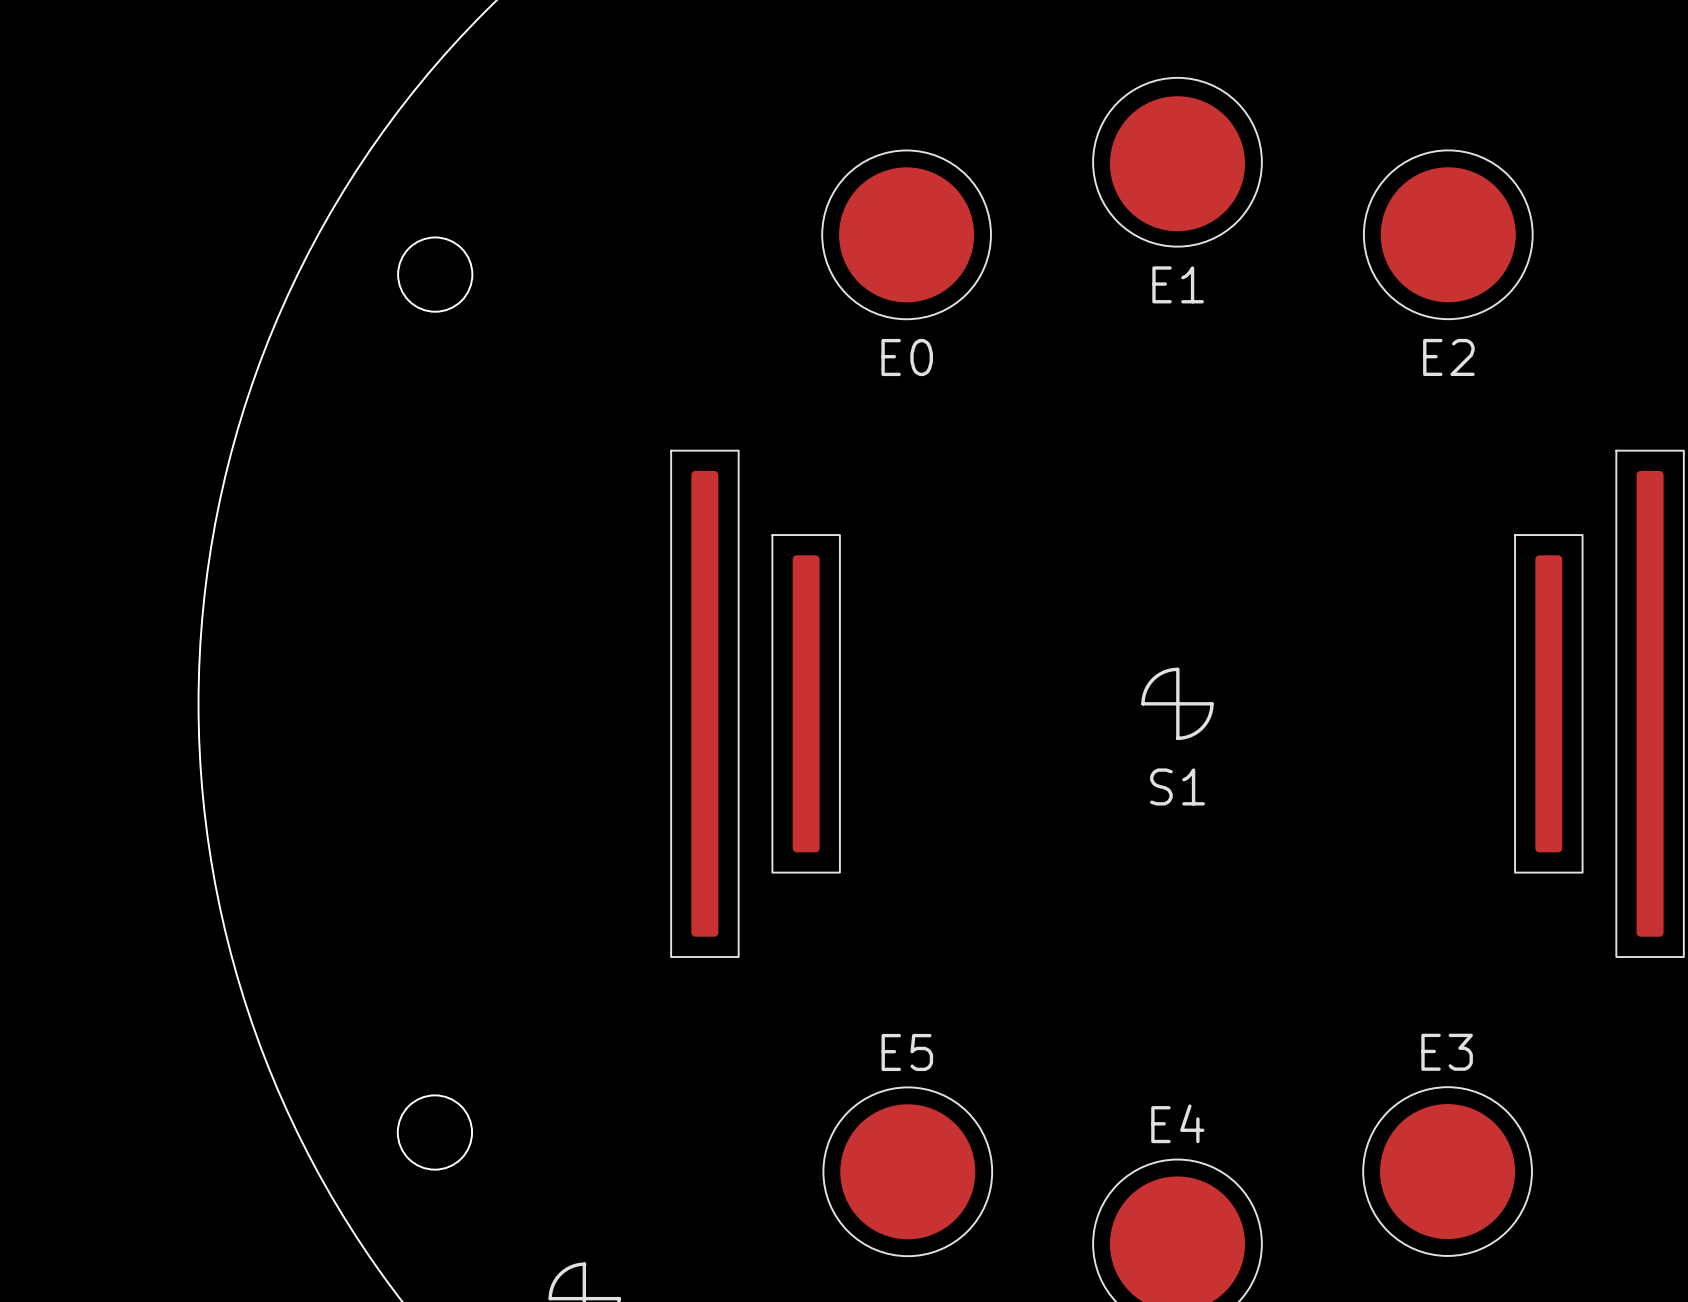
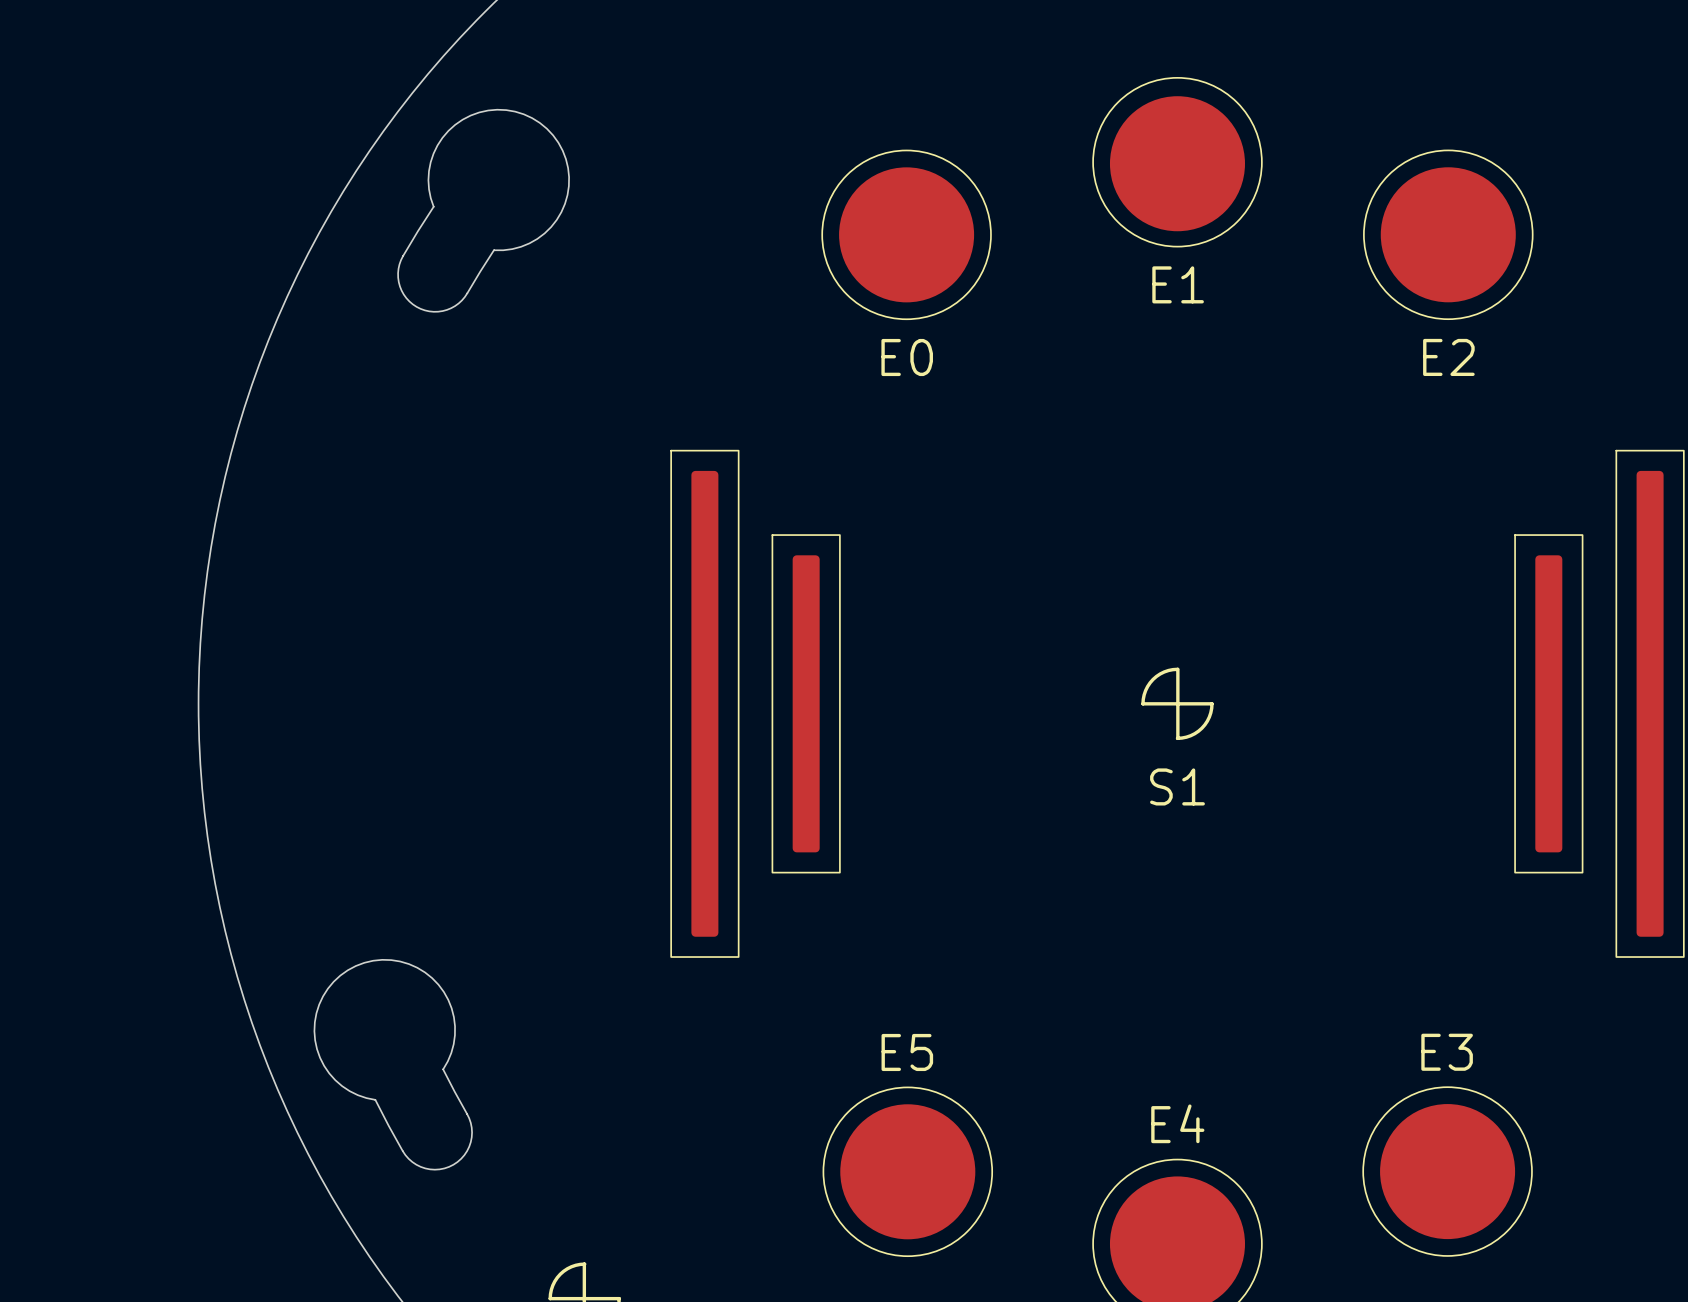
round board edge: [397, 236, 474, 313] -> none
board edge: none -> (494, 250) (464, 297) (451, 308) (438, 311) (420, 308) (409, 301) (401, 290) (398, 273) (401, 260) (433, 206) (429, 189) (428, 171) (437, 145) (455, 124) (470, 115) (488, 110) (506, 110) (532, 118) (553, 135) (565, 159) (568, 186) (561, 212) (544, 233) (521, 246) (494, 250)
board edge: none -> (443, 1069) (453, 1044) (453, 1017) (443, 991) (425, 972) (400, 961) (373, 960) (347, 970) (327, 988) (316, 1013) (314, 1031) (317, 1049) (324, 1065) (342, 1086) (357, 1095) (375, 1099) (405, 1155) (416, 1164) (430, 1169) (444, 1168) (457, 1162) (467, 1151) (471, 1137) (469, 1118) (443, 1069)
round board edge: [396, 1094, 473, 1171] -> none

